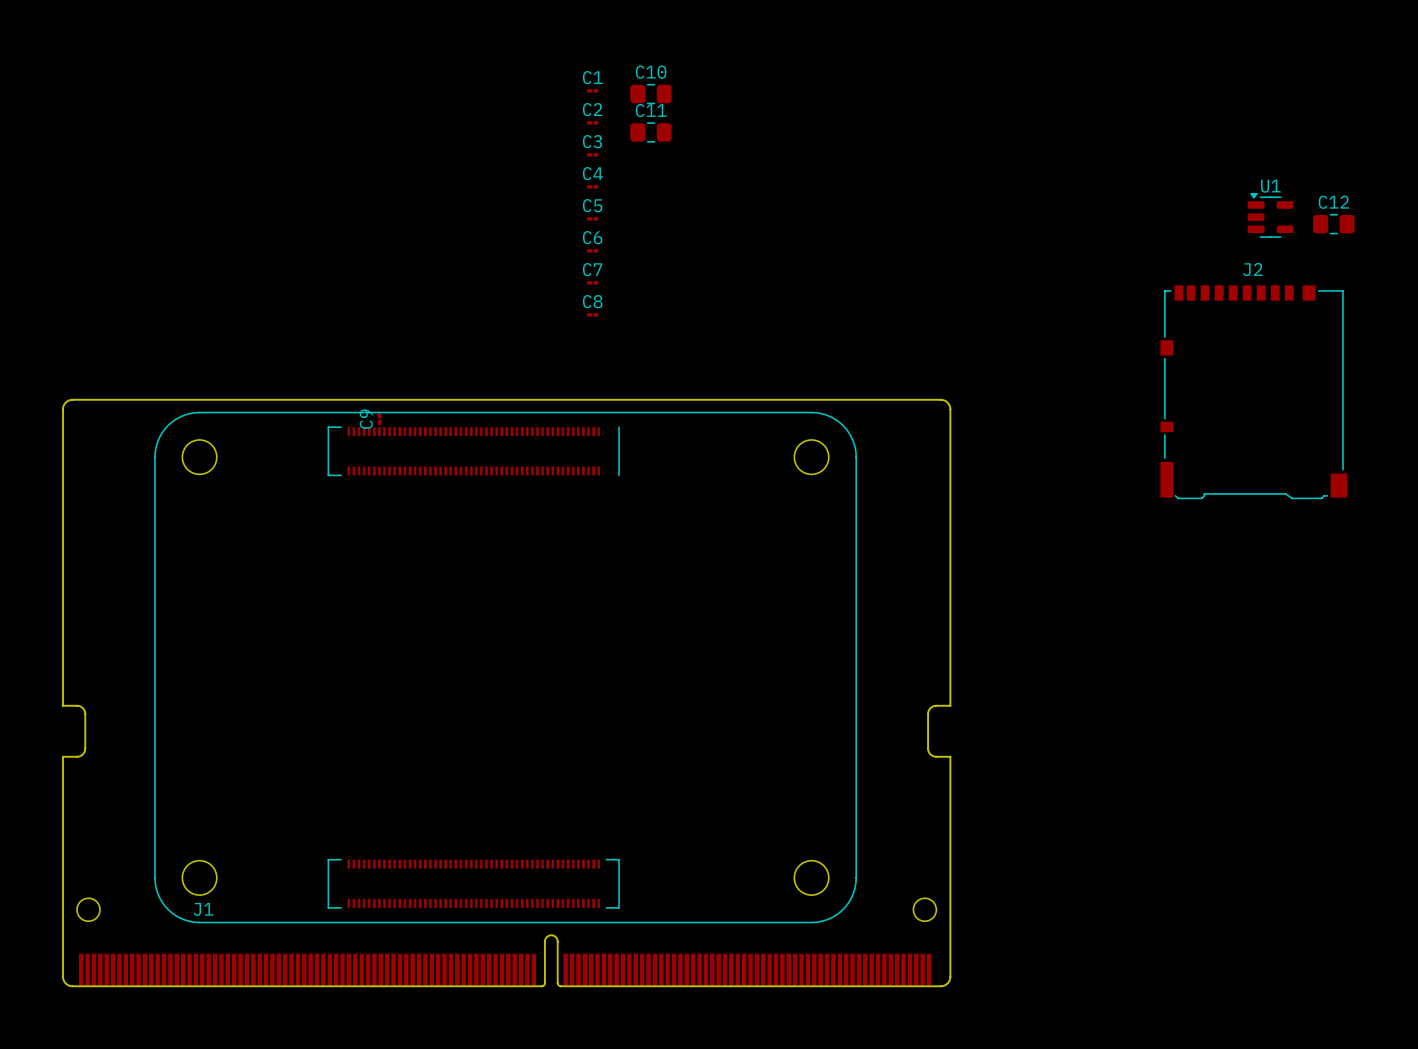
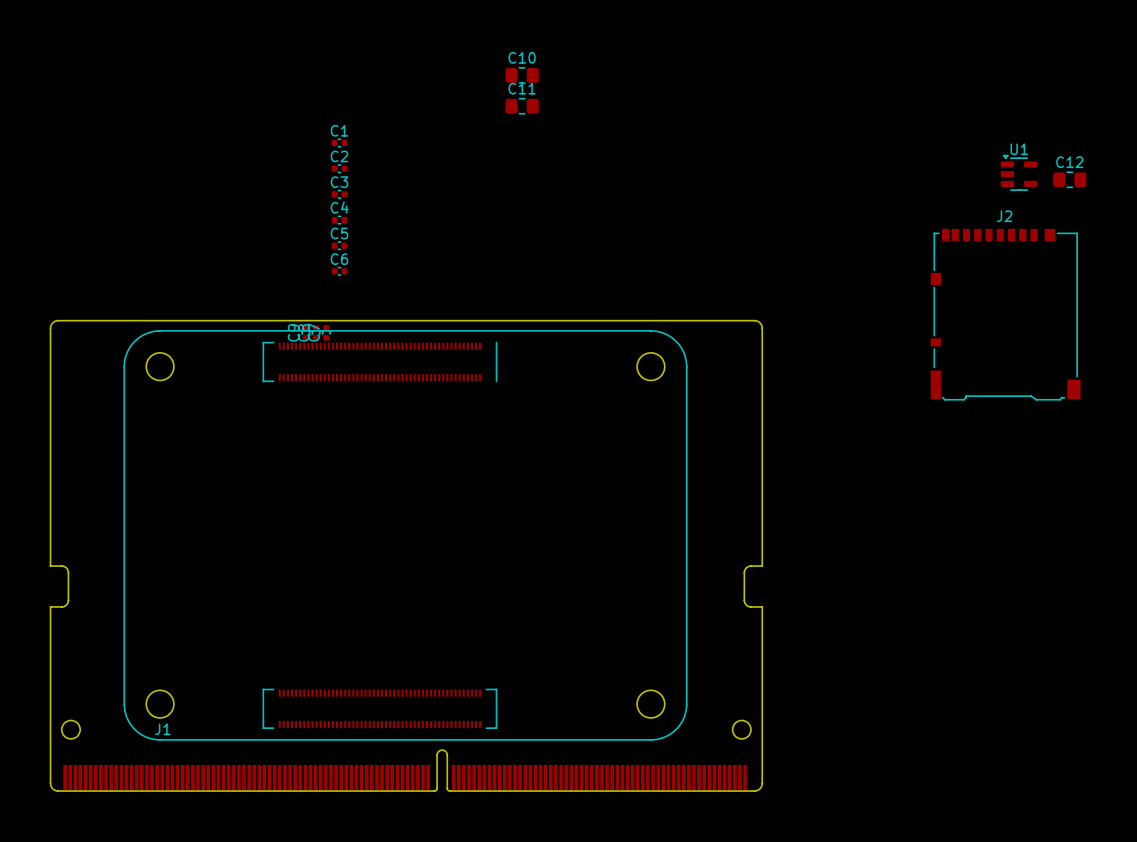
C1 footprint: [586, 88, 599, 93] -> [331, 138, 348, 148]
C2 footprint: [586, 120, 599, 125] -> [331, 164, 348, 173]
C3 footprint: [586, 152, 599, 157] -> [331, 190, 348, 199]
C4 footprint: [586, 184, 599, 189] -> [331, 215, 348, 225]
C5 footprint: [586, 216, 599, 221] -> [331, 241, 348, 250]
C6 footprint: [586, 248, 599, 253] -> [331, 267, 348, 276]
C7 footprint: [586, 280, 599, 285] -> [322, 325, 331, 341]
C8 footprint: [586, 312, 599, 317] -> [311, 325, 321, 341]
C9 footprint: [377, 413, 382, 425] -> [301, 325, 311, 341]

